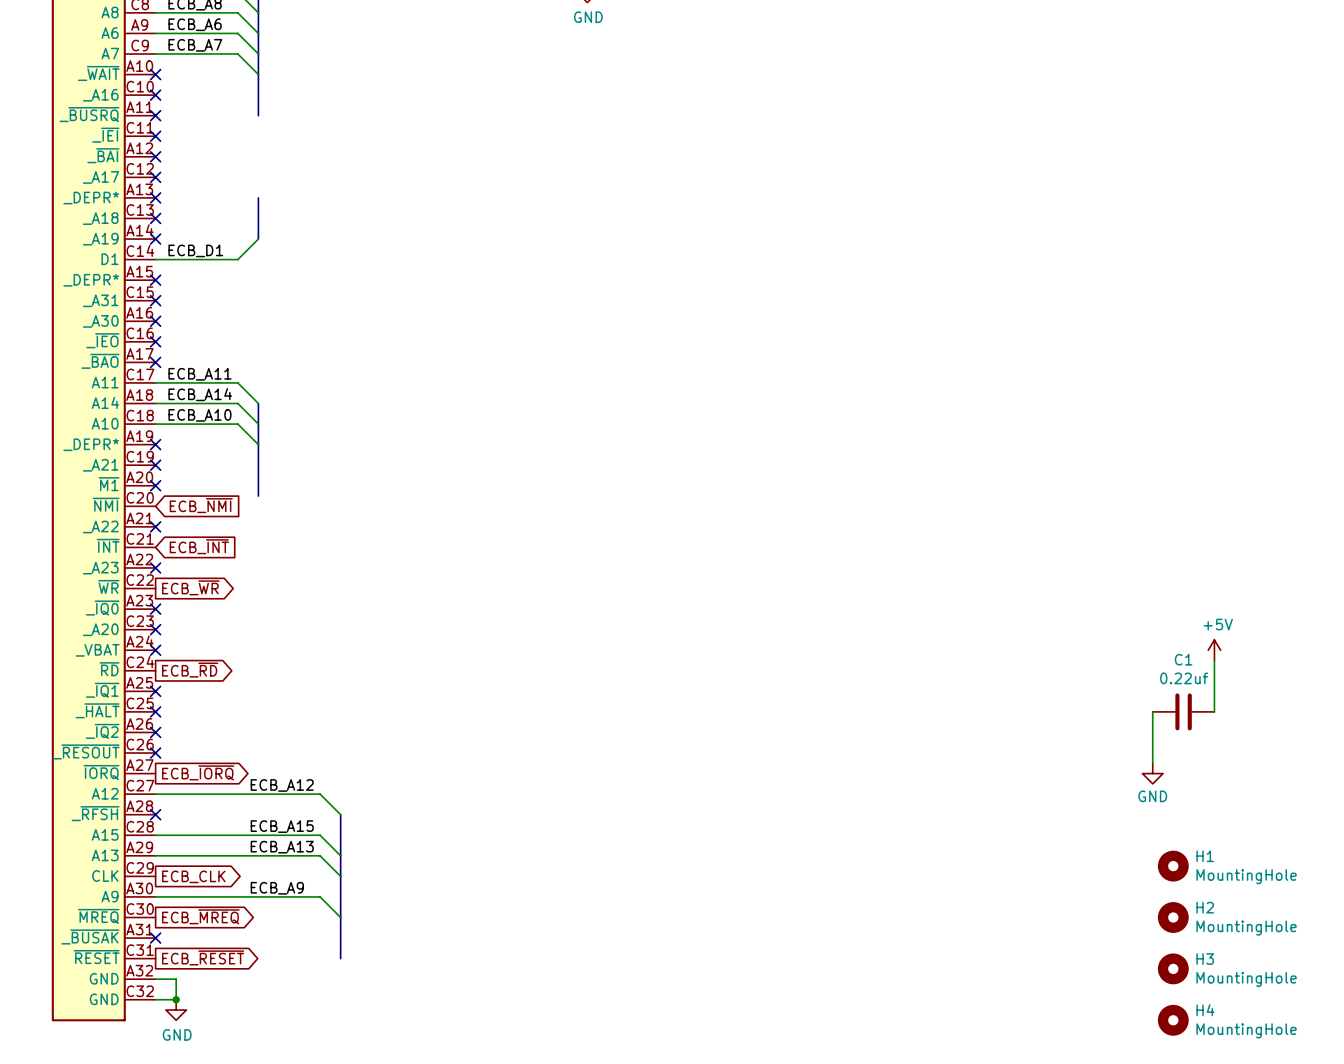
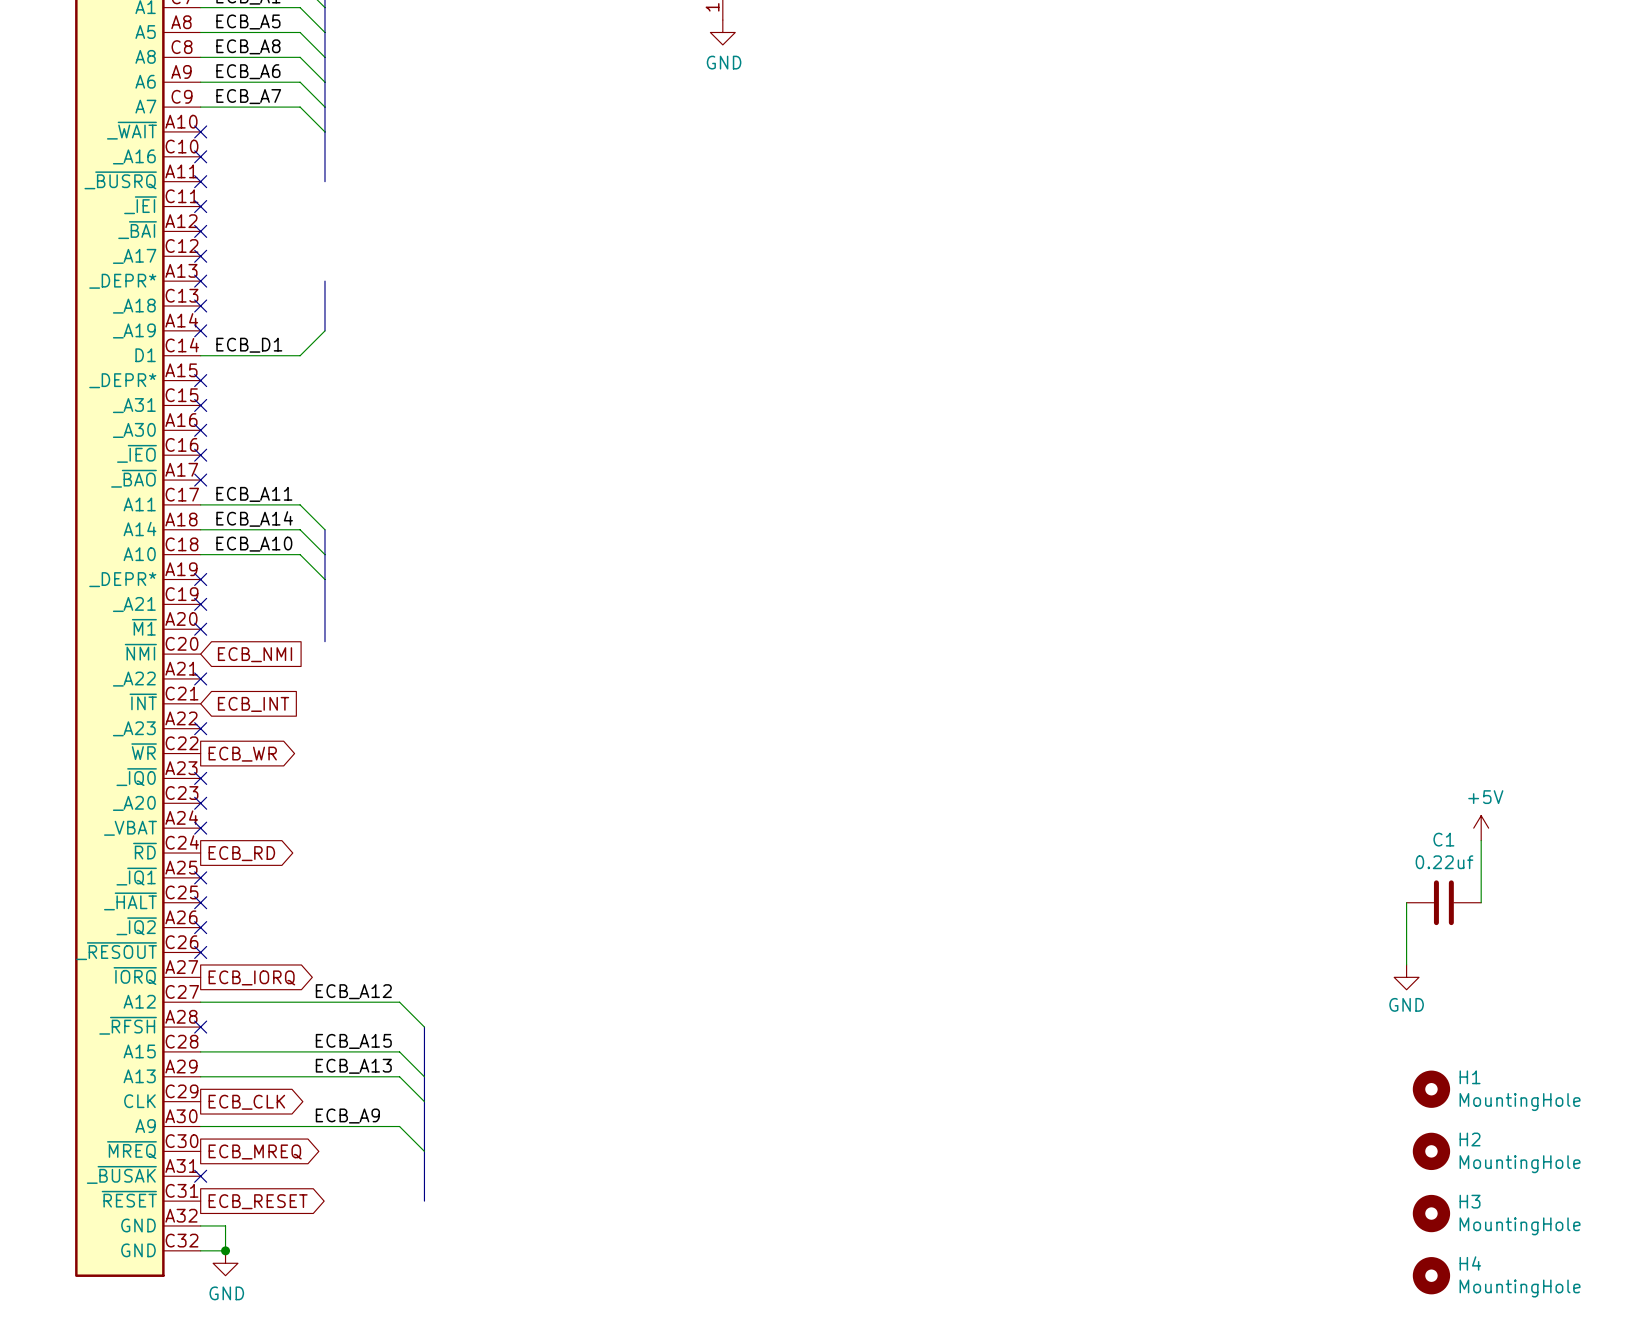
global label: ECB_~{NMI} (201, 505) -> ECB_NMI (255, 654)
global label: ECB_~{INT} (199, 546) -> ECB_INT (253, 704)
global label: ECB_~{WR} (190, 587) -> ECB_WR (242, 754)
global label: ECB_~{RD} (190, 670) -> ECB_RD (241, 853)
global label: ECB_~{IORQ} (198, 772) -> ECB_IORQ (251, 977)
global label: ECB_~{MREQ} (200, 916) -> ECB_MREQ (255, 1151)
global label: ECB_~{RESET} (203, 957) -> ECB_RESET (258, 1201)

